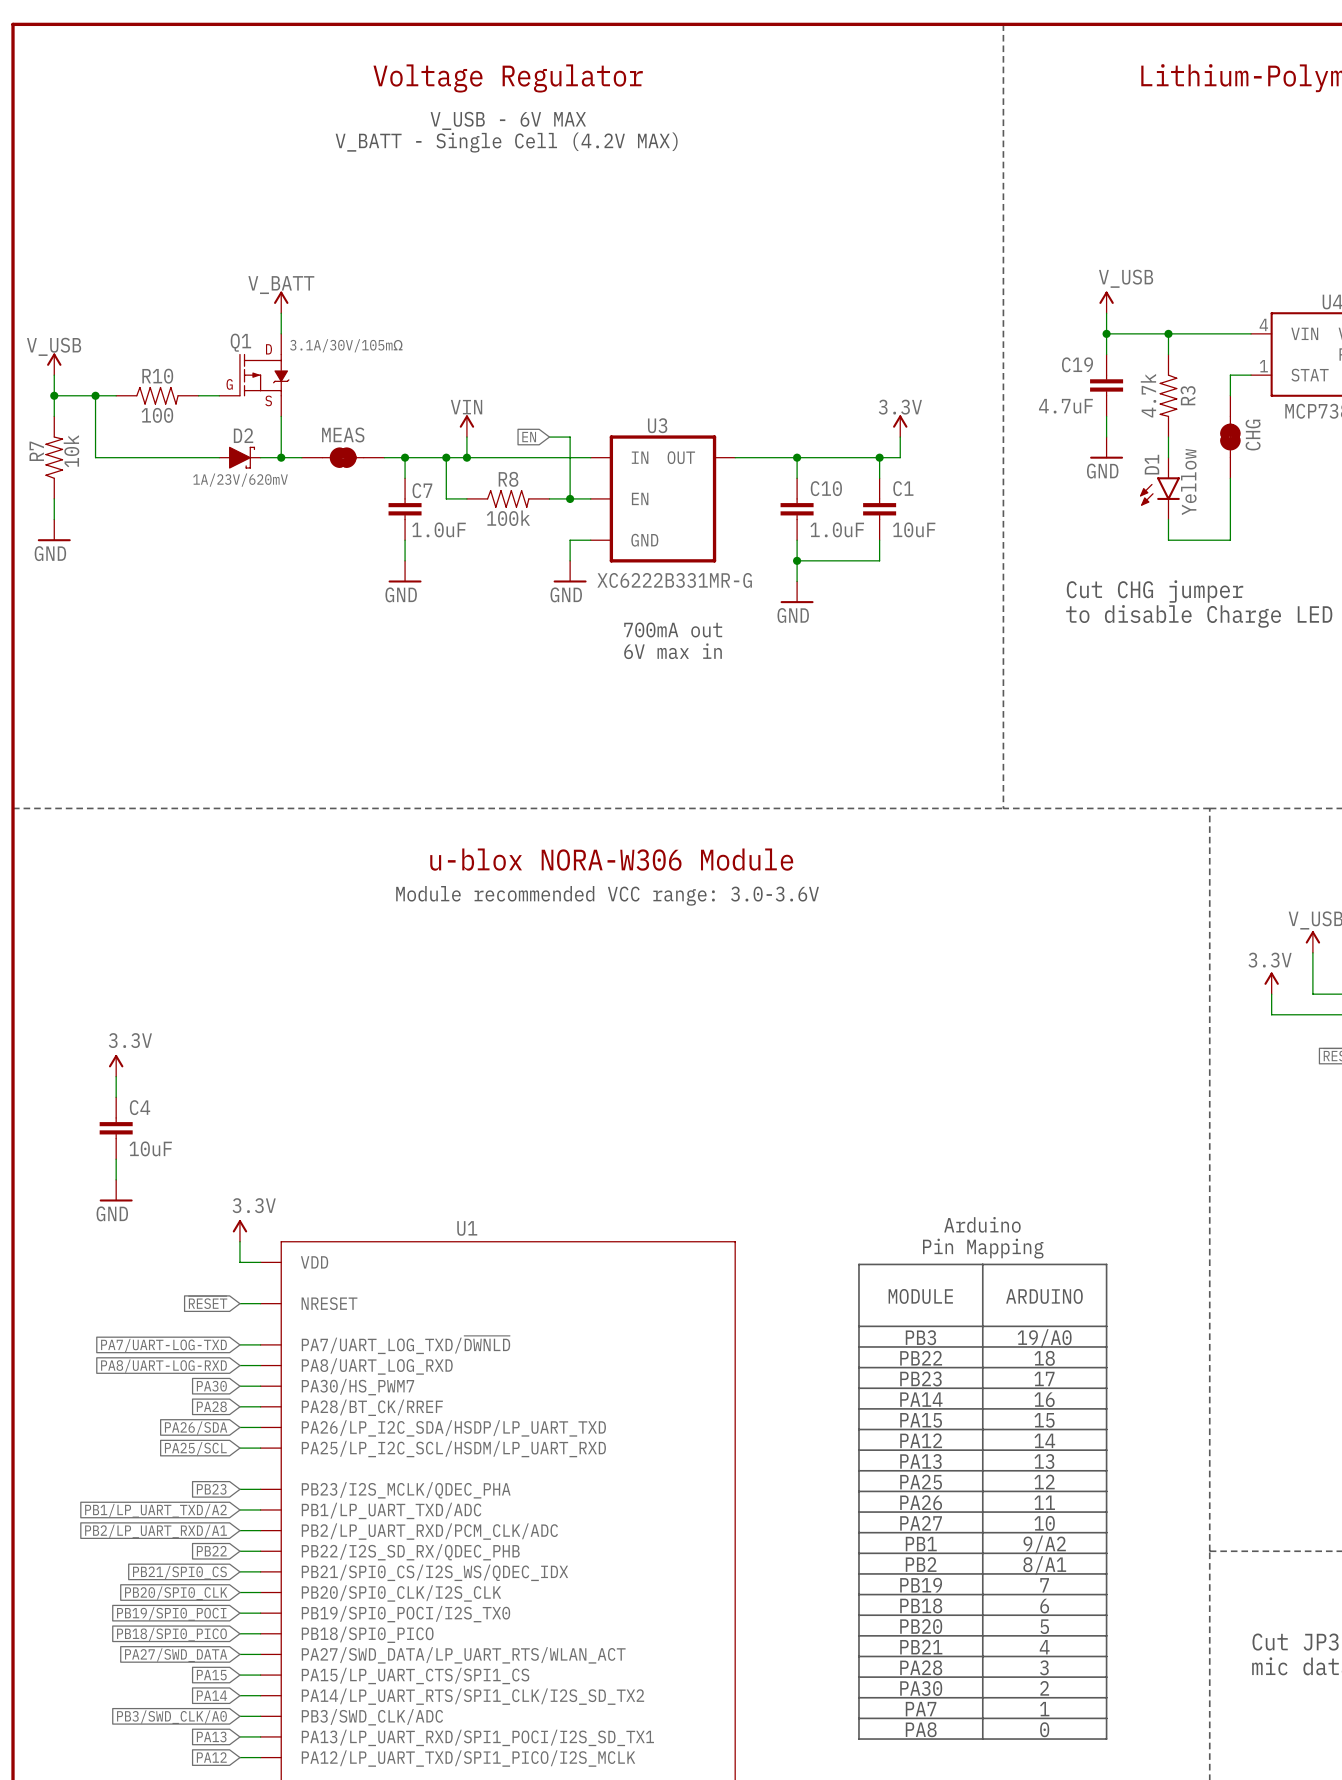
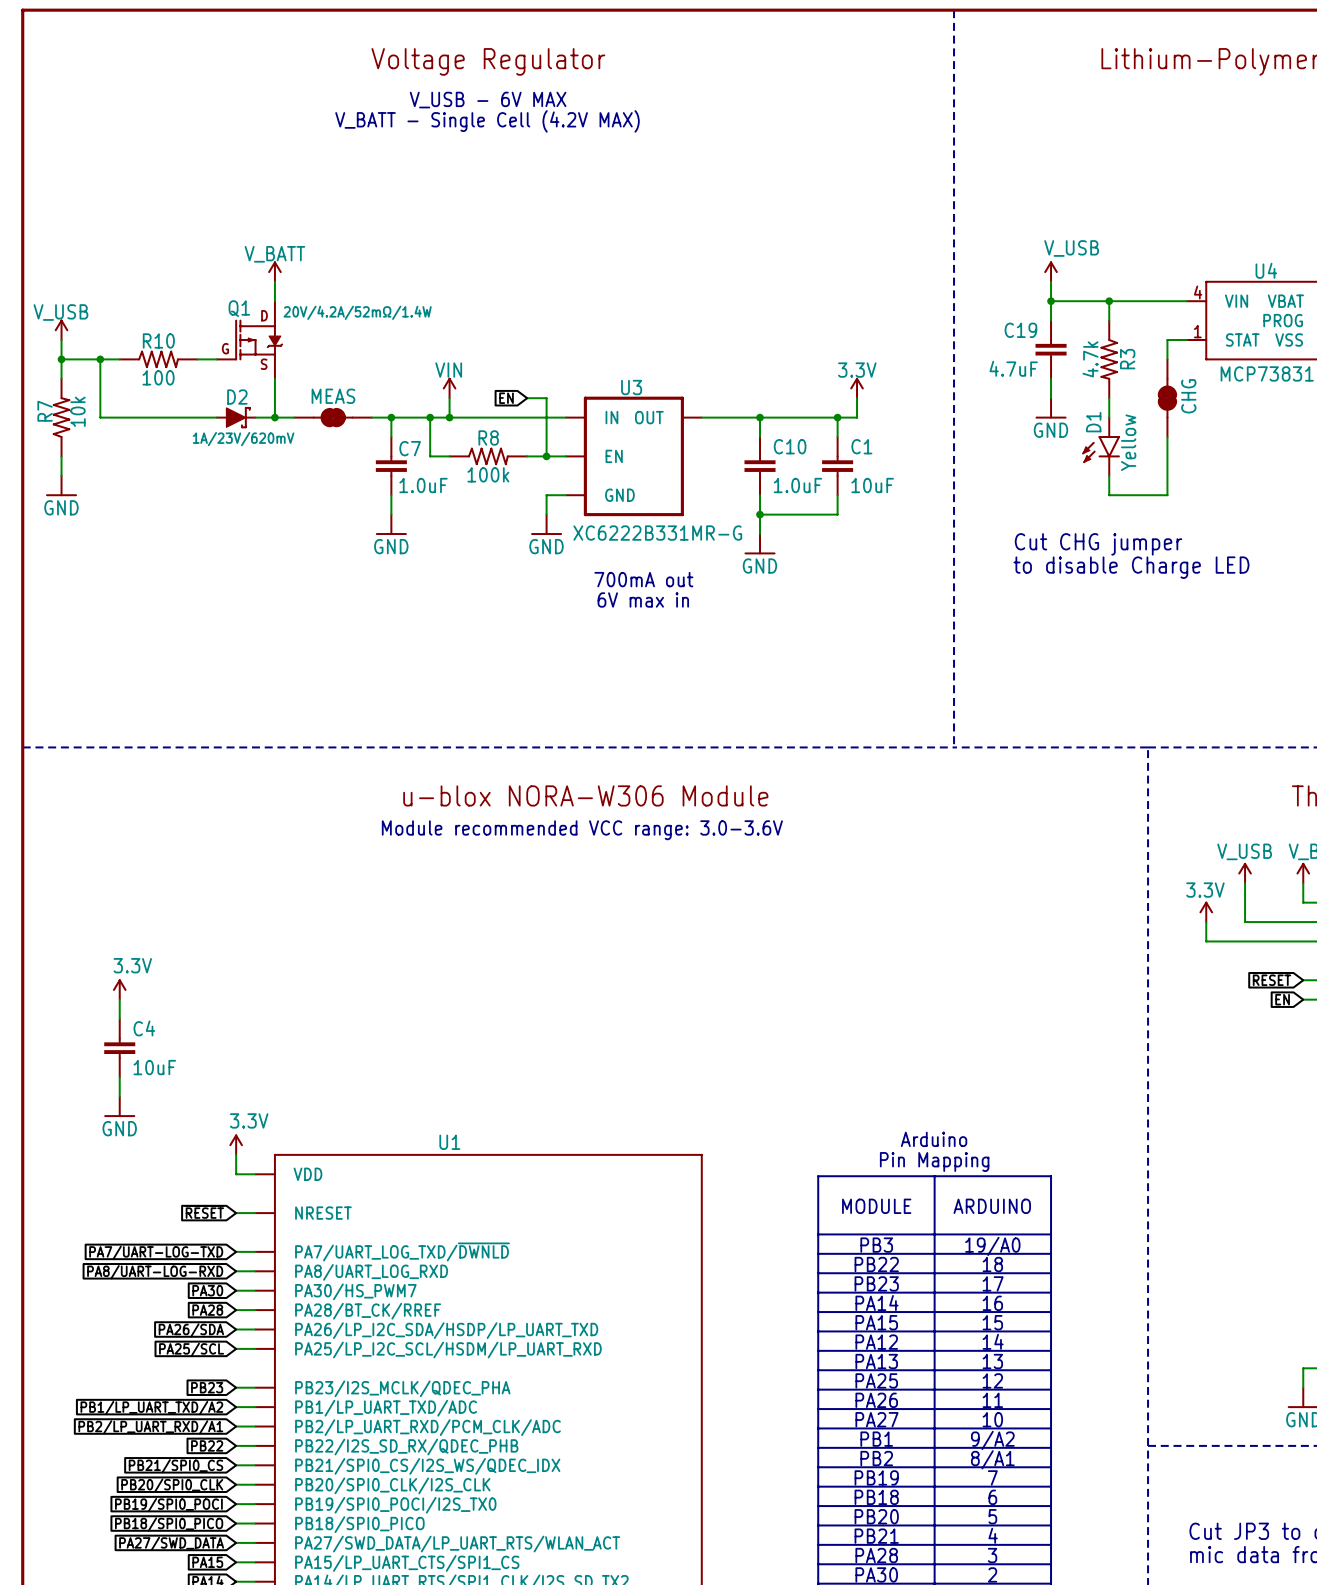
Q1 value: 3.1A/30V/105mΩ (346, 345) -> 20V/4.2A/52mΩ/1.4W (357, 312)

